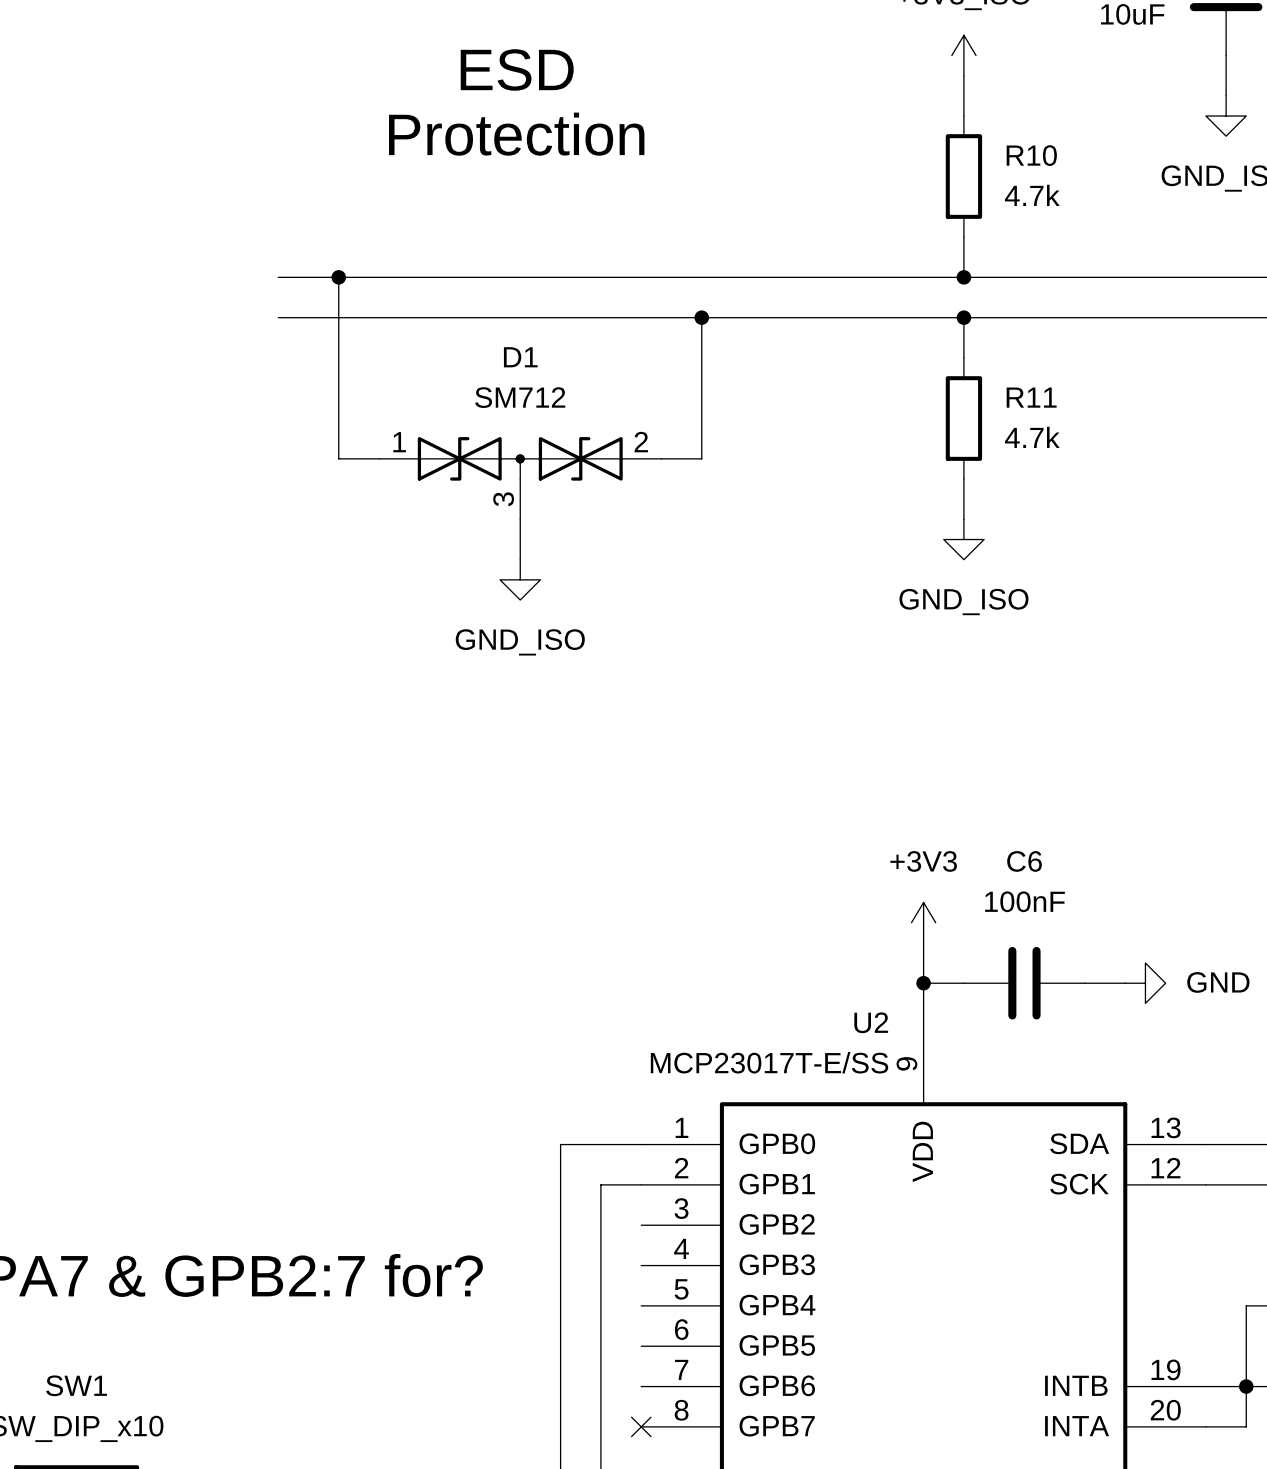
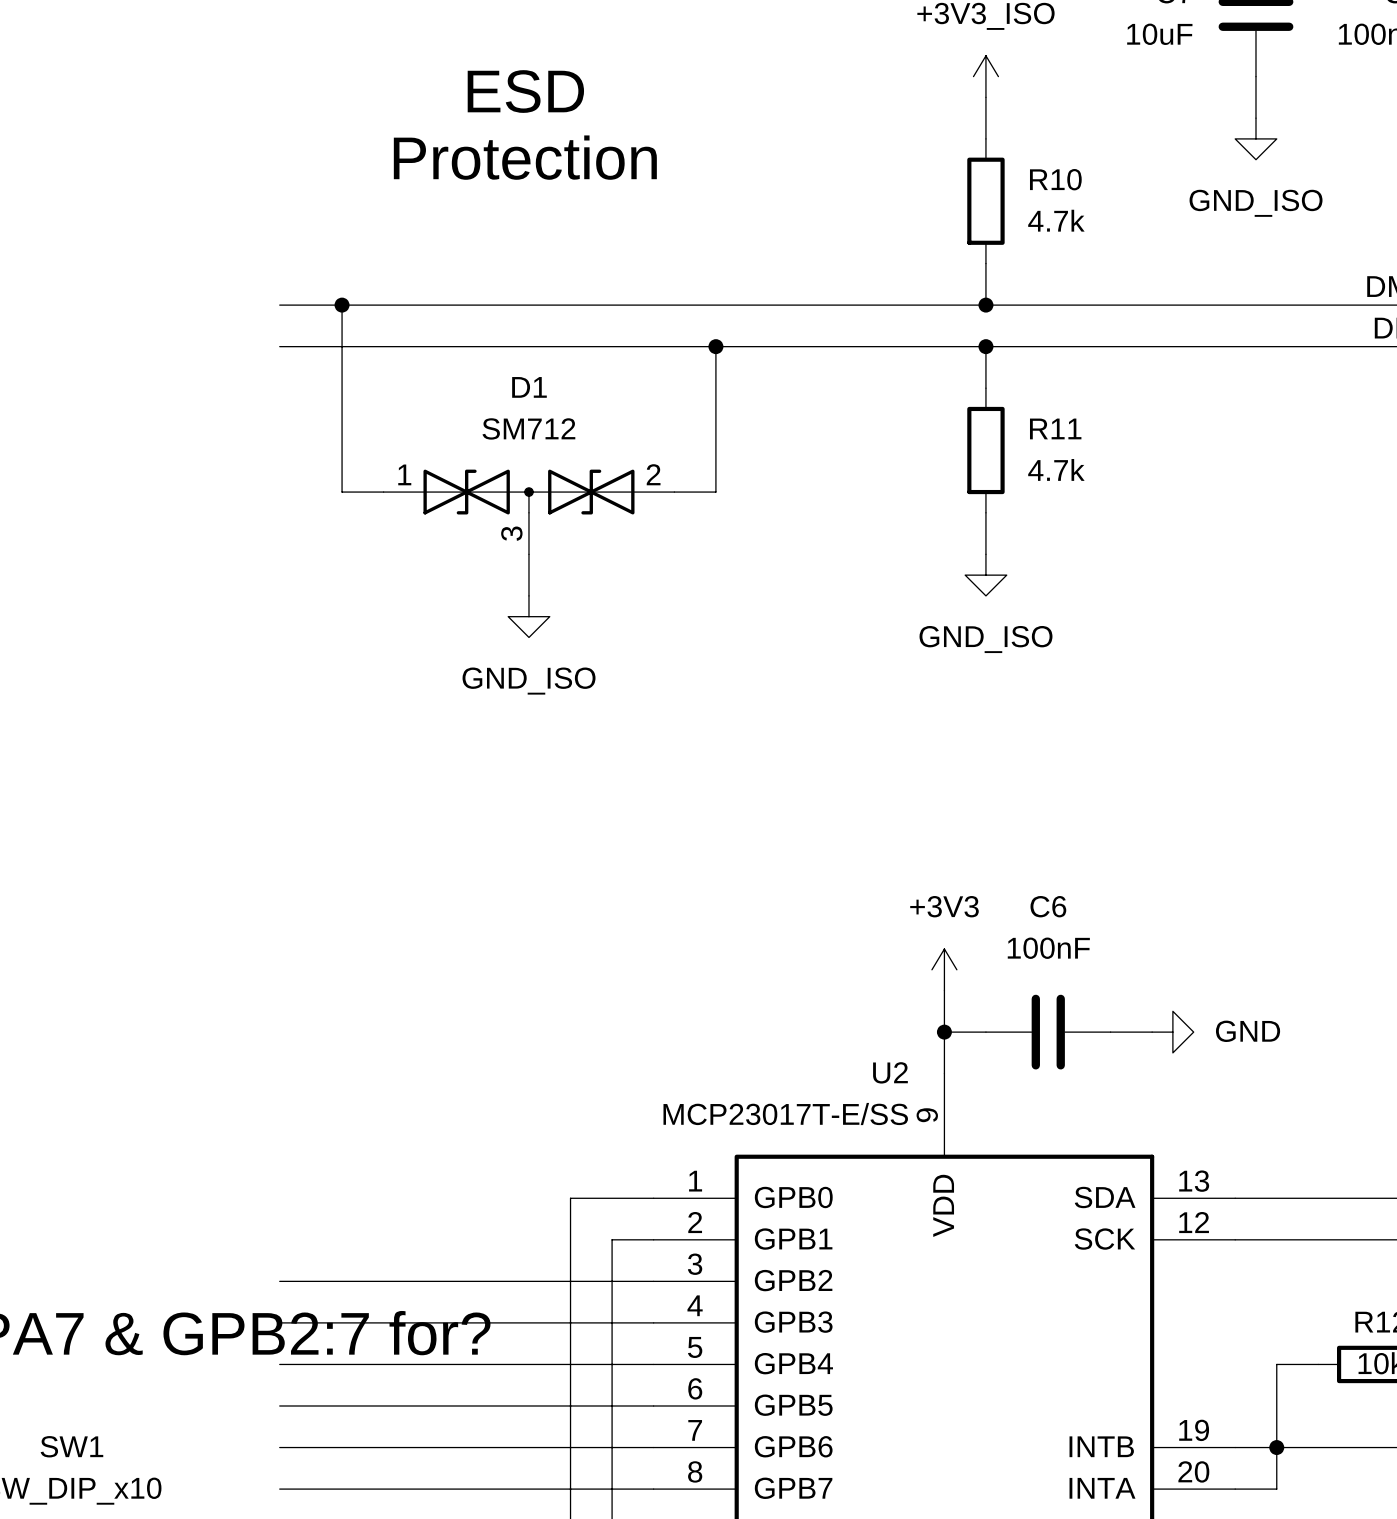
wire: none -> (279, 1281) (653, 1281)
wire: none -> (279, 1322) (653, 1322)
wire: none -> (279, 1364) (653, 1364)
wire: none -> (279, 1405) (653, 1405)
wire: none -> (279, 1447) (653, 1447)
wire: none -> (279, 1489) (653, 1489)
no-connect mark: (641, 1426) -> none

